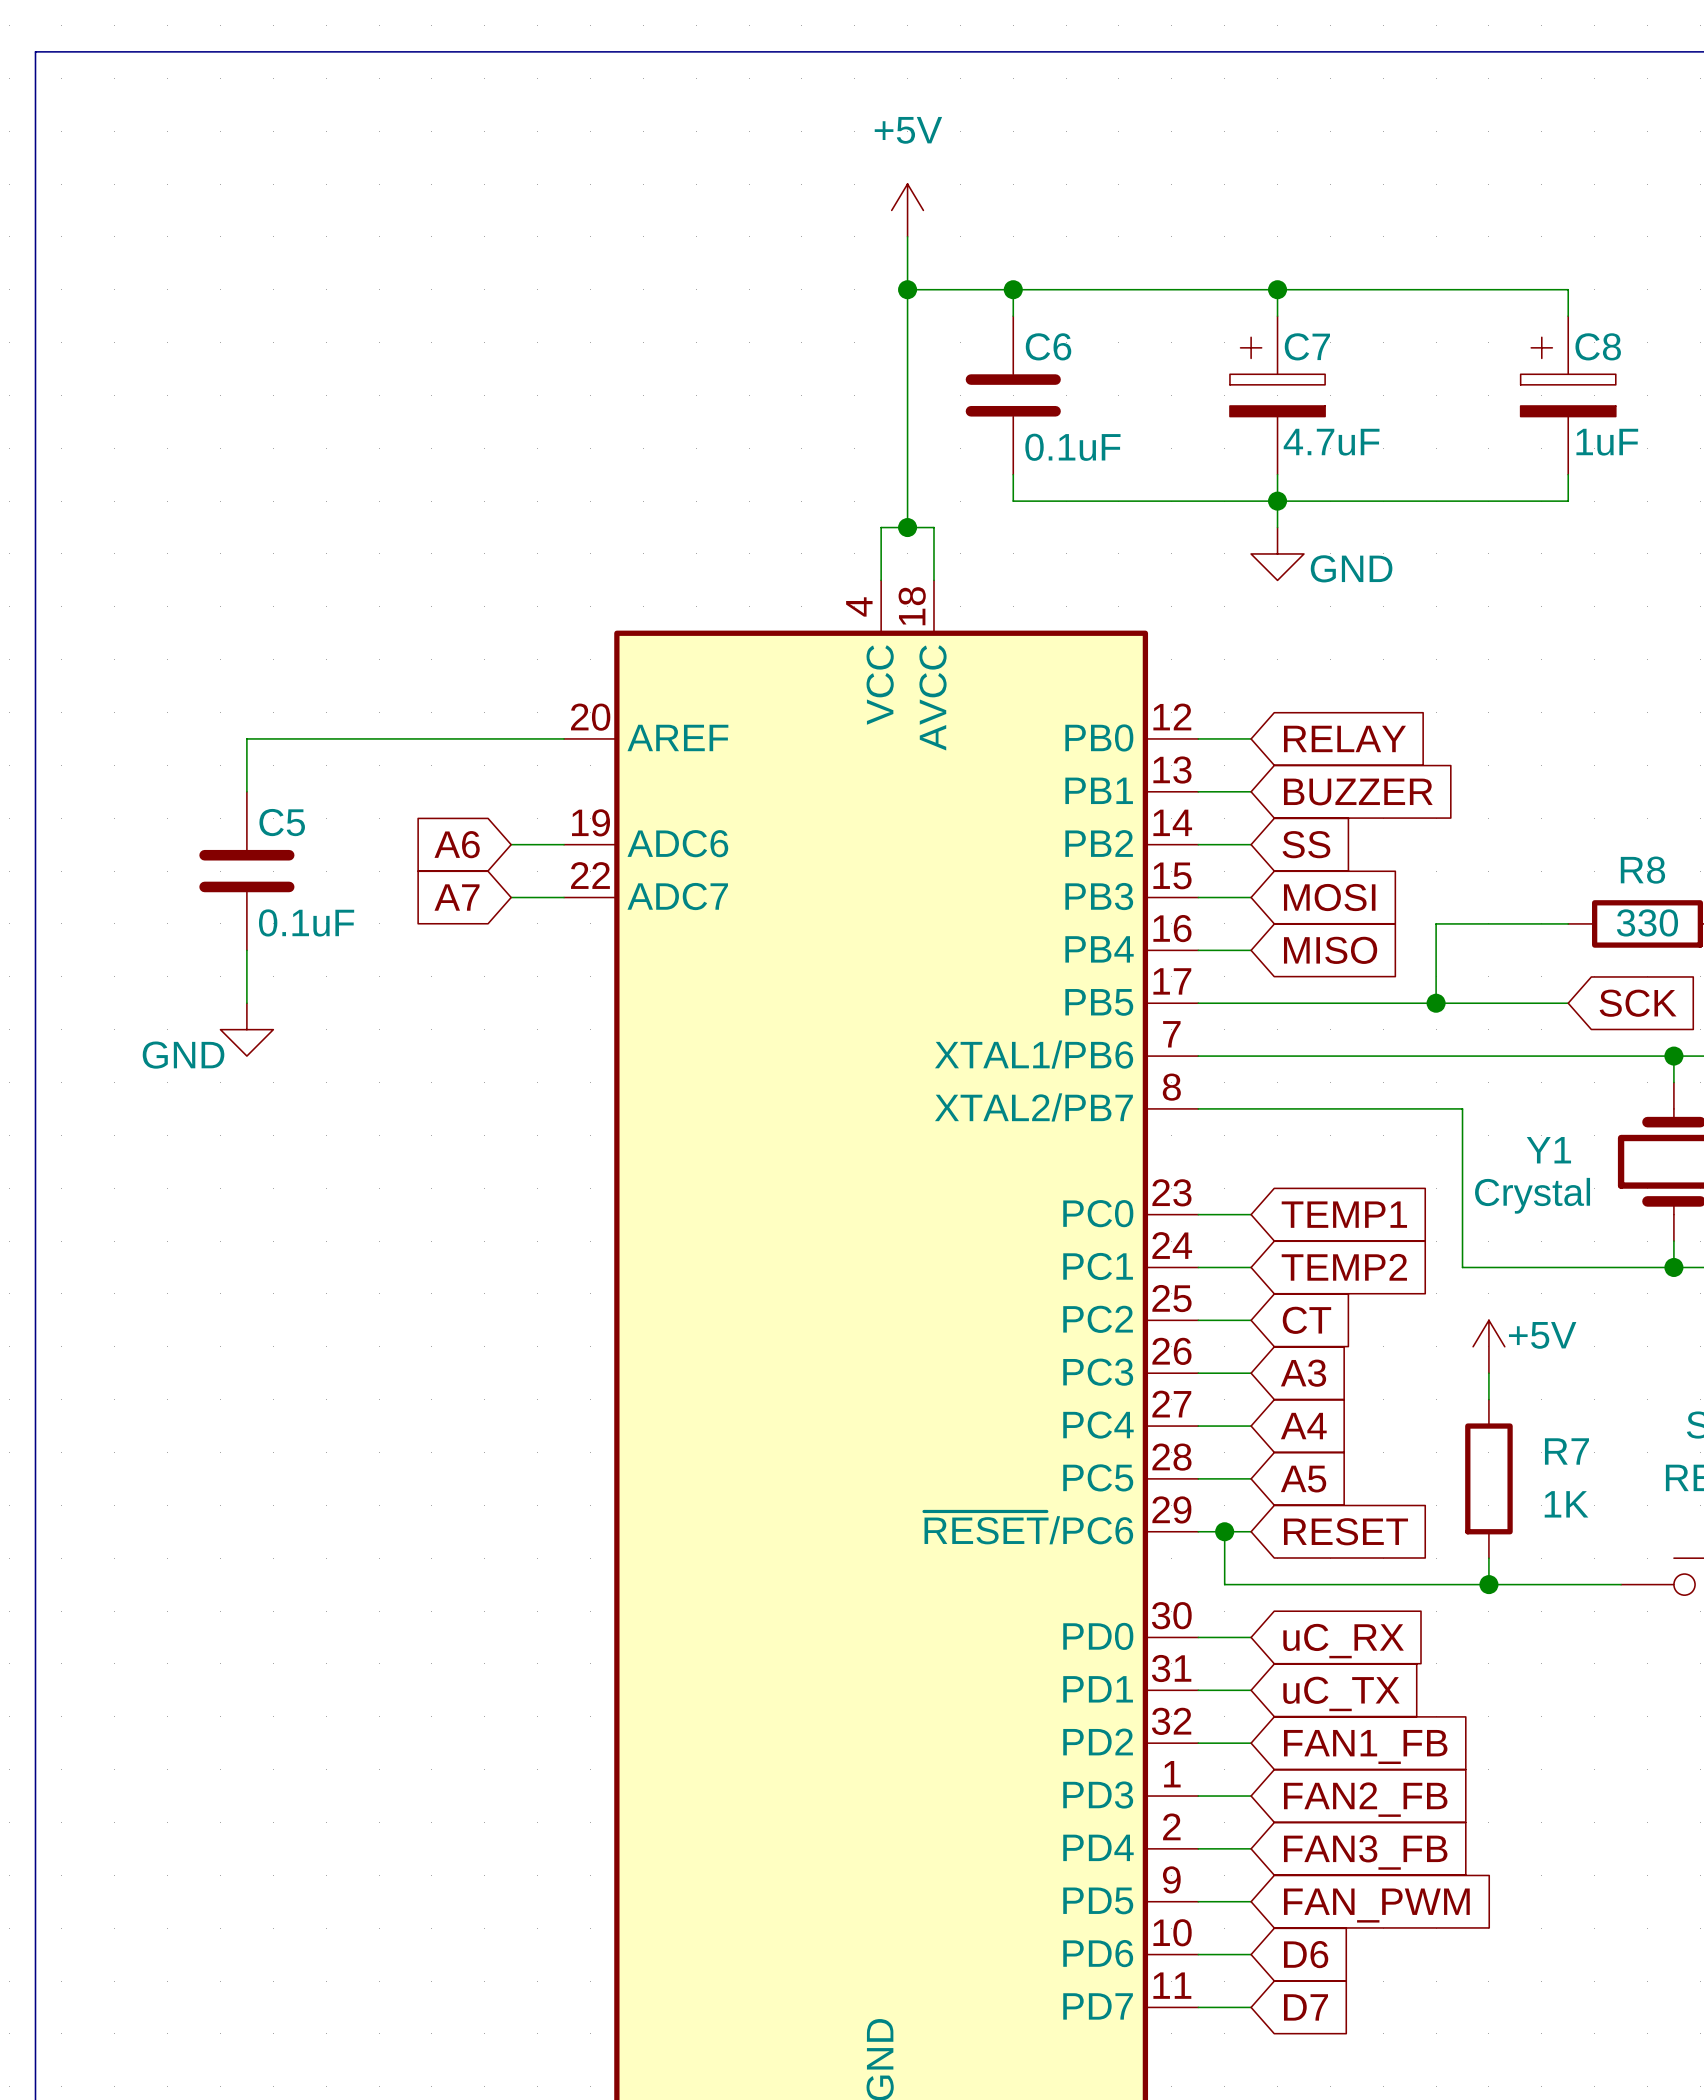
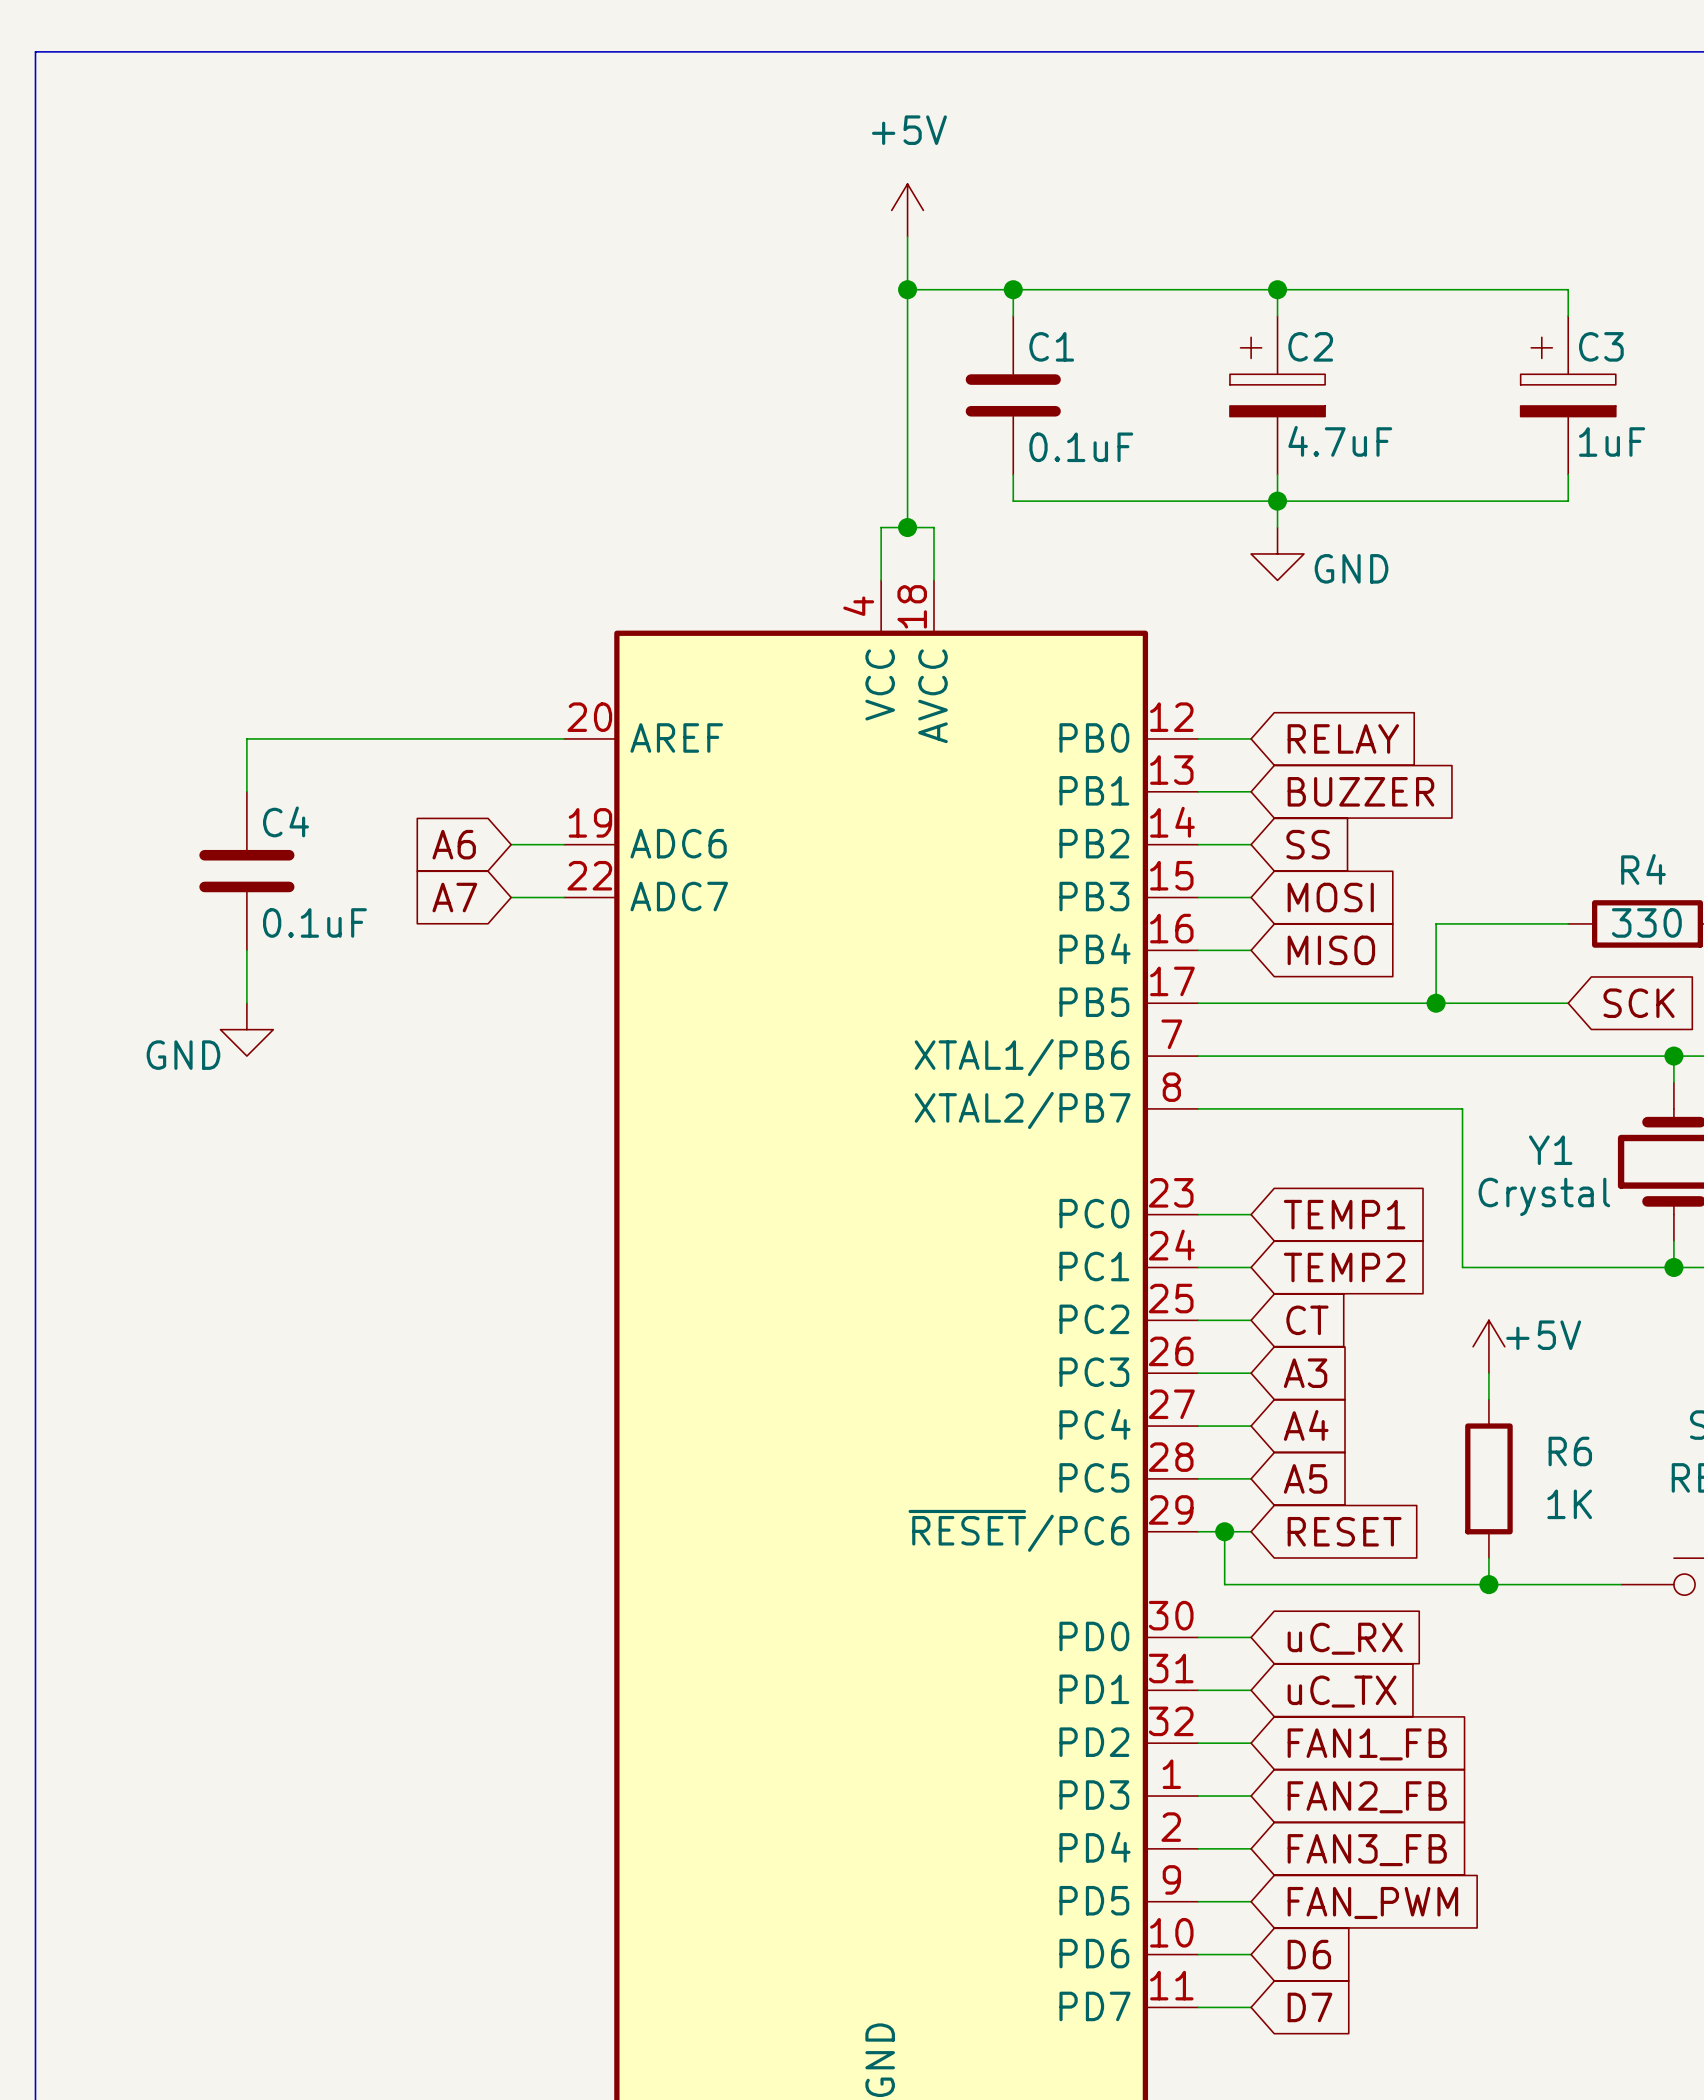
C6 name: C6 (1048, 346) -> C1 (1051, 346)
C7 name: C7 (1307, 346) -> C2 (1310, 346)
C8 name: C8 (1598, 346) -> C3 (1601, 346)
C5 name: C5 (282, 822) -> C4 (285, 821)
R8 name: R8 (1642, 870) -> R4 (1643, 869)
R7 name: R7 (1566, 1451) -> R6 (1570, 1451)

